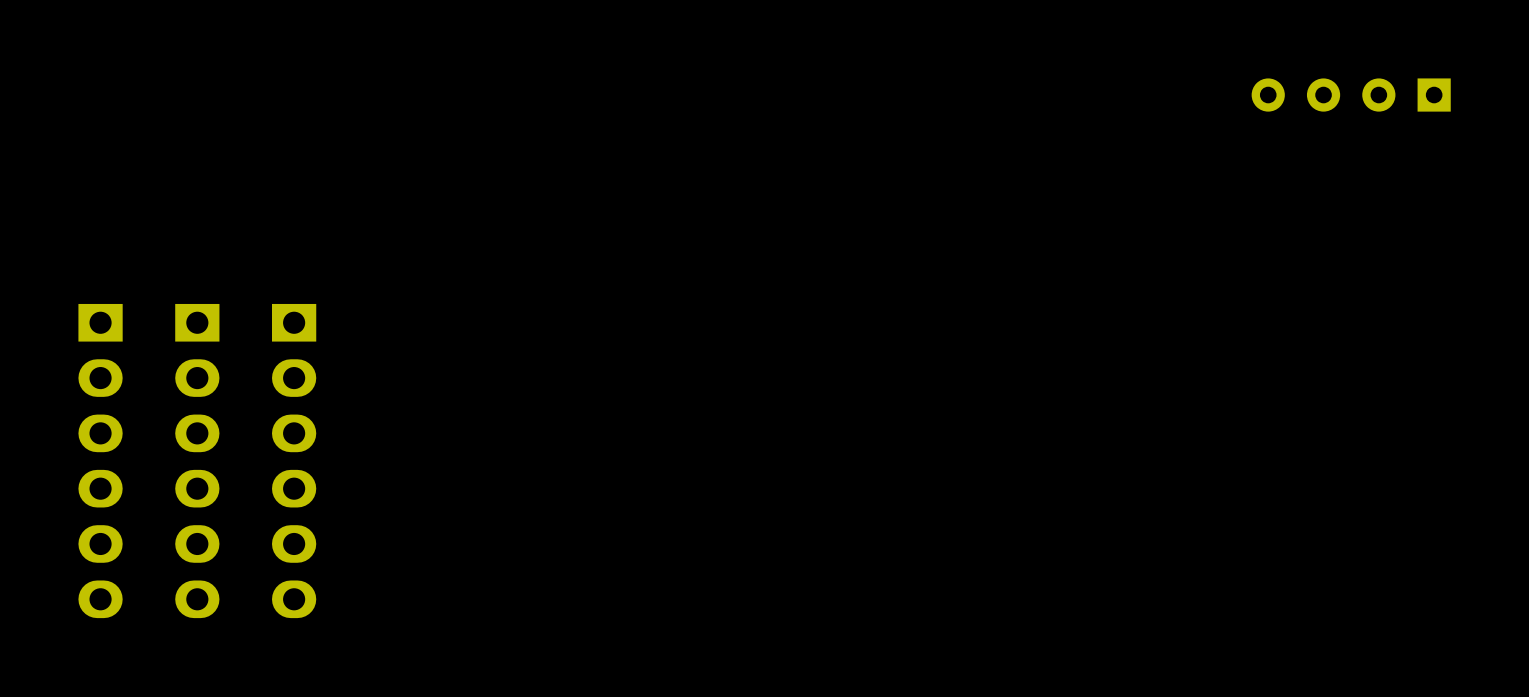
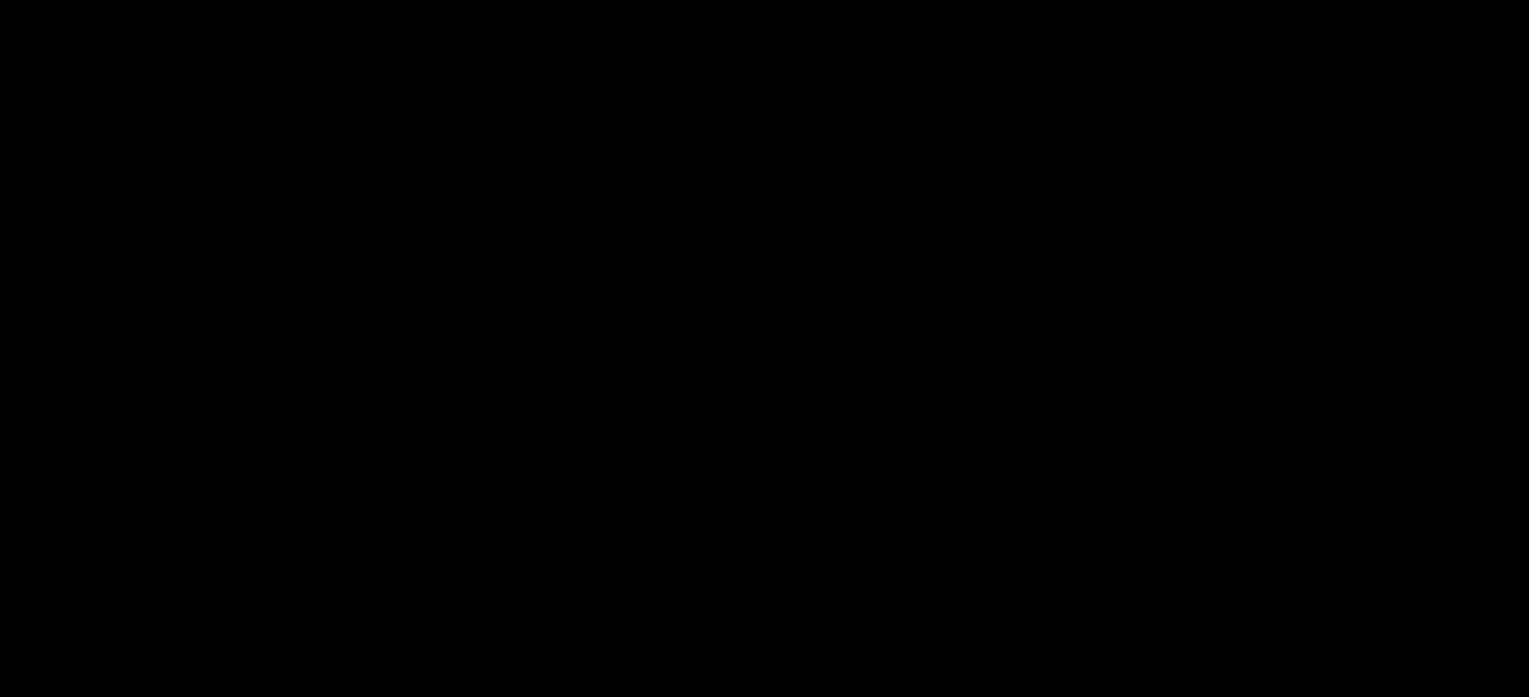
part: (1351, 95) -> none
part: (100, 461) -> none
part: (197, 461) -> none
part: (294, 461) -> none

